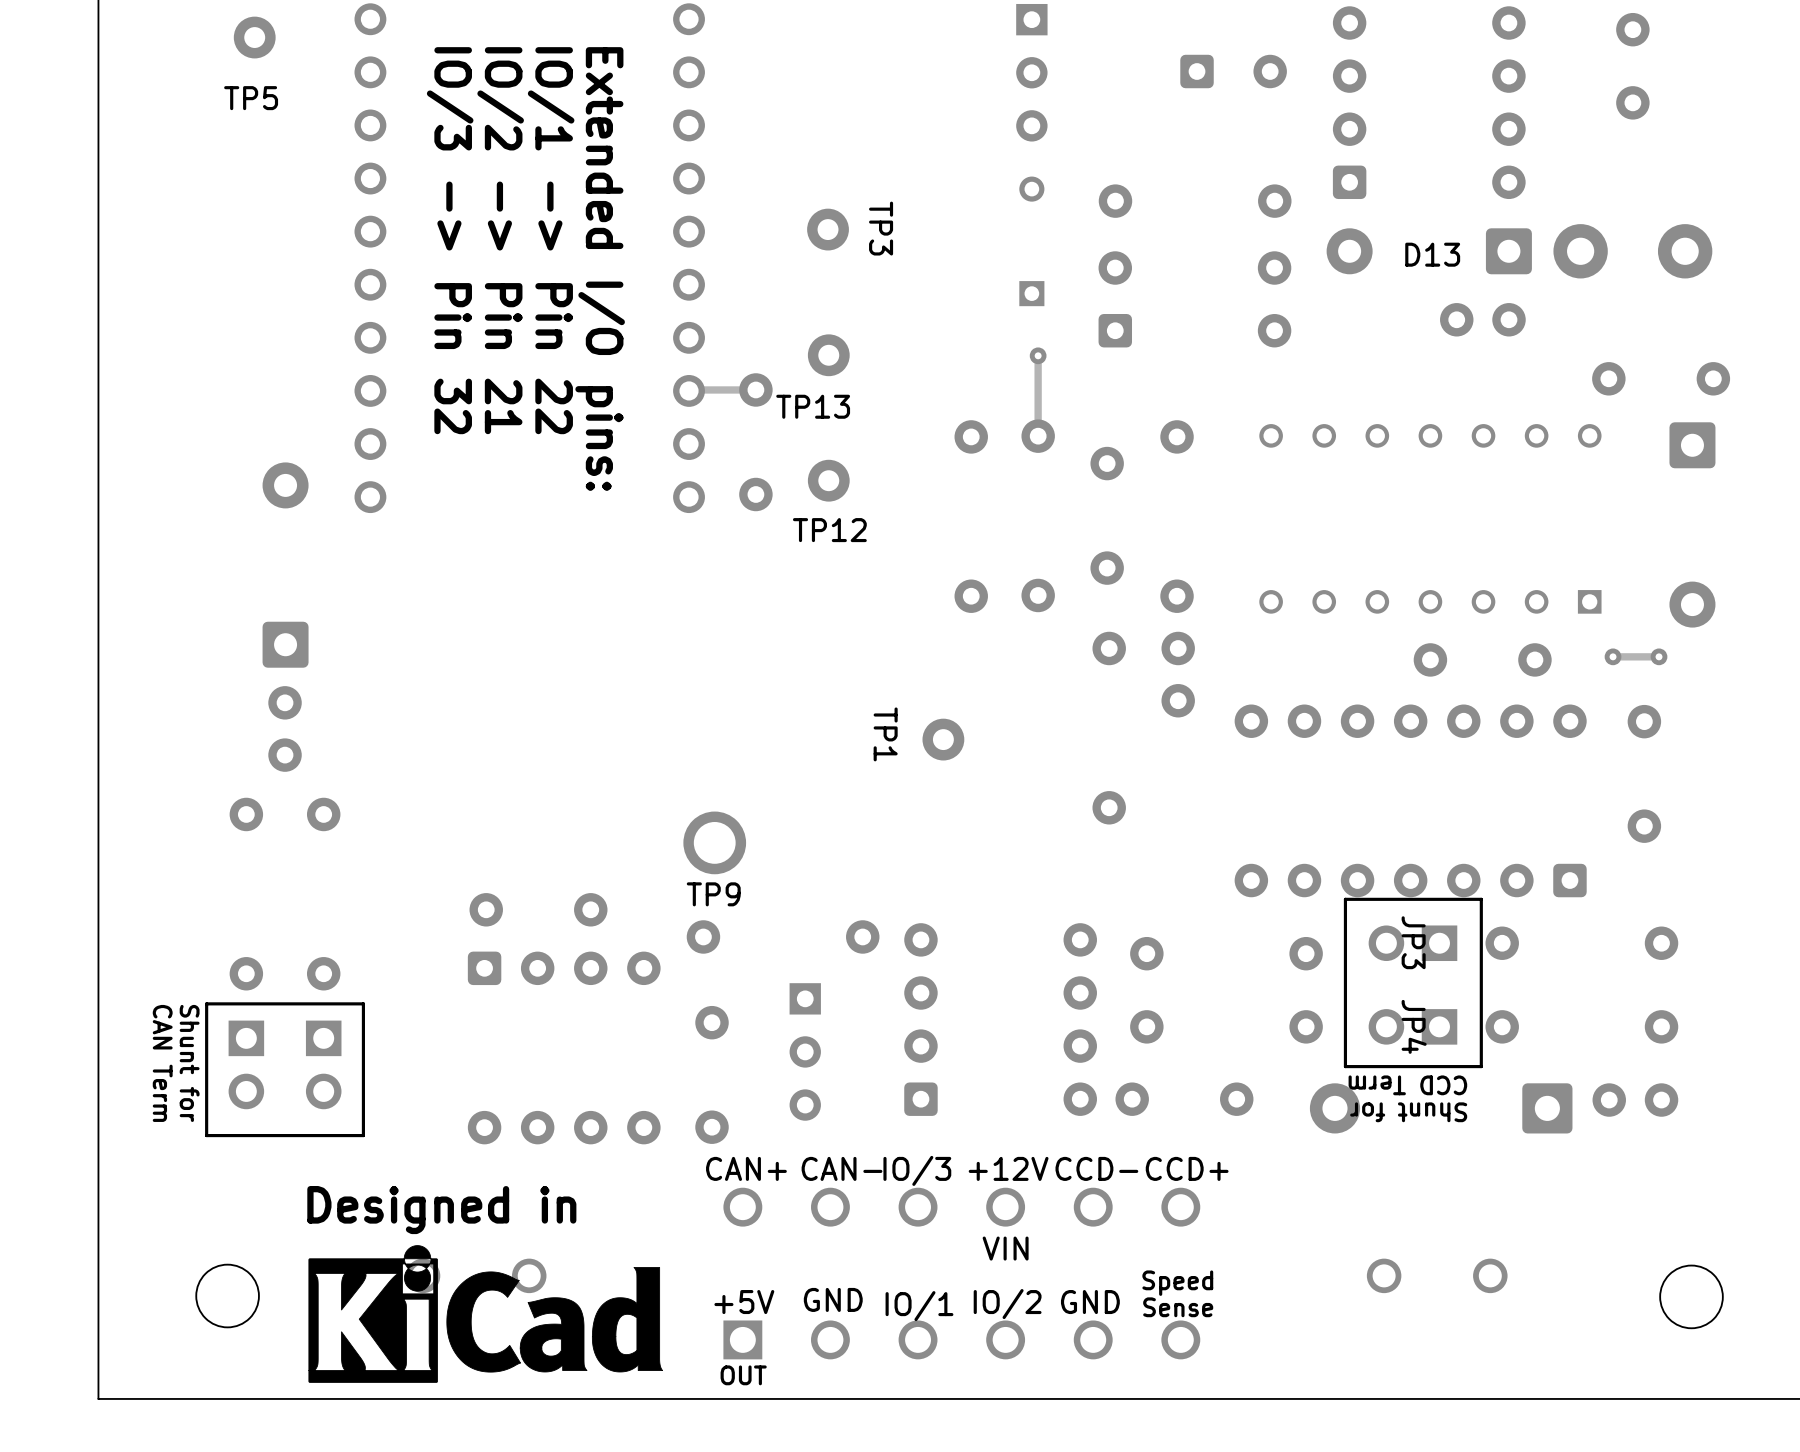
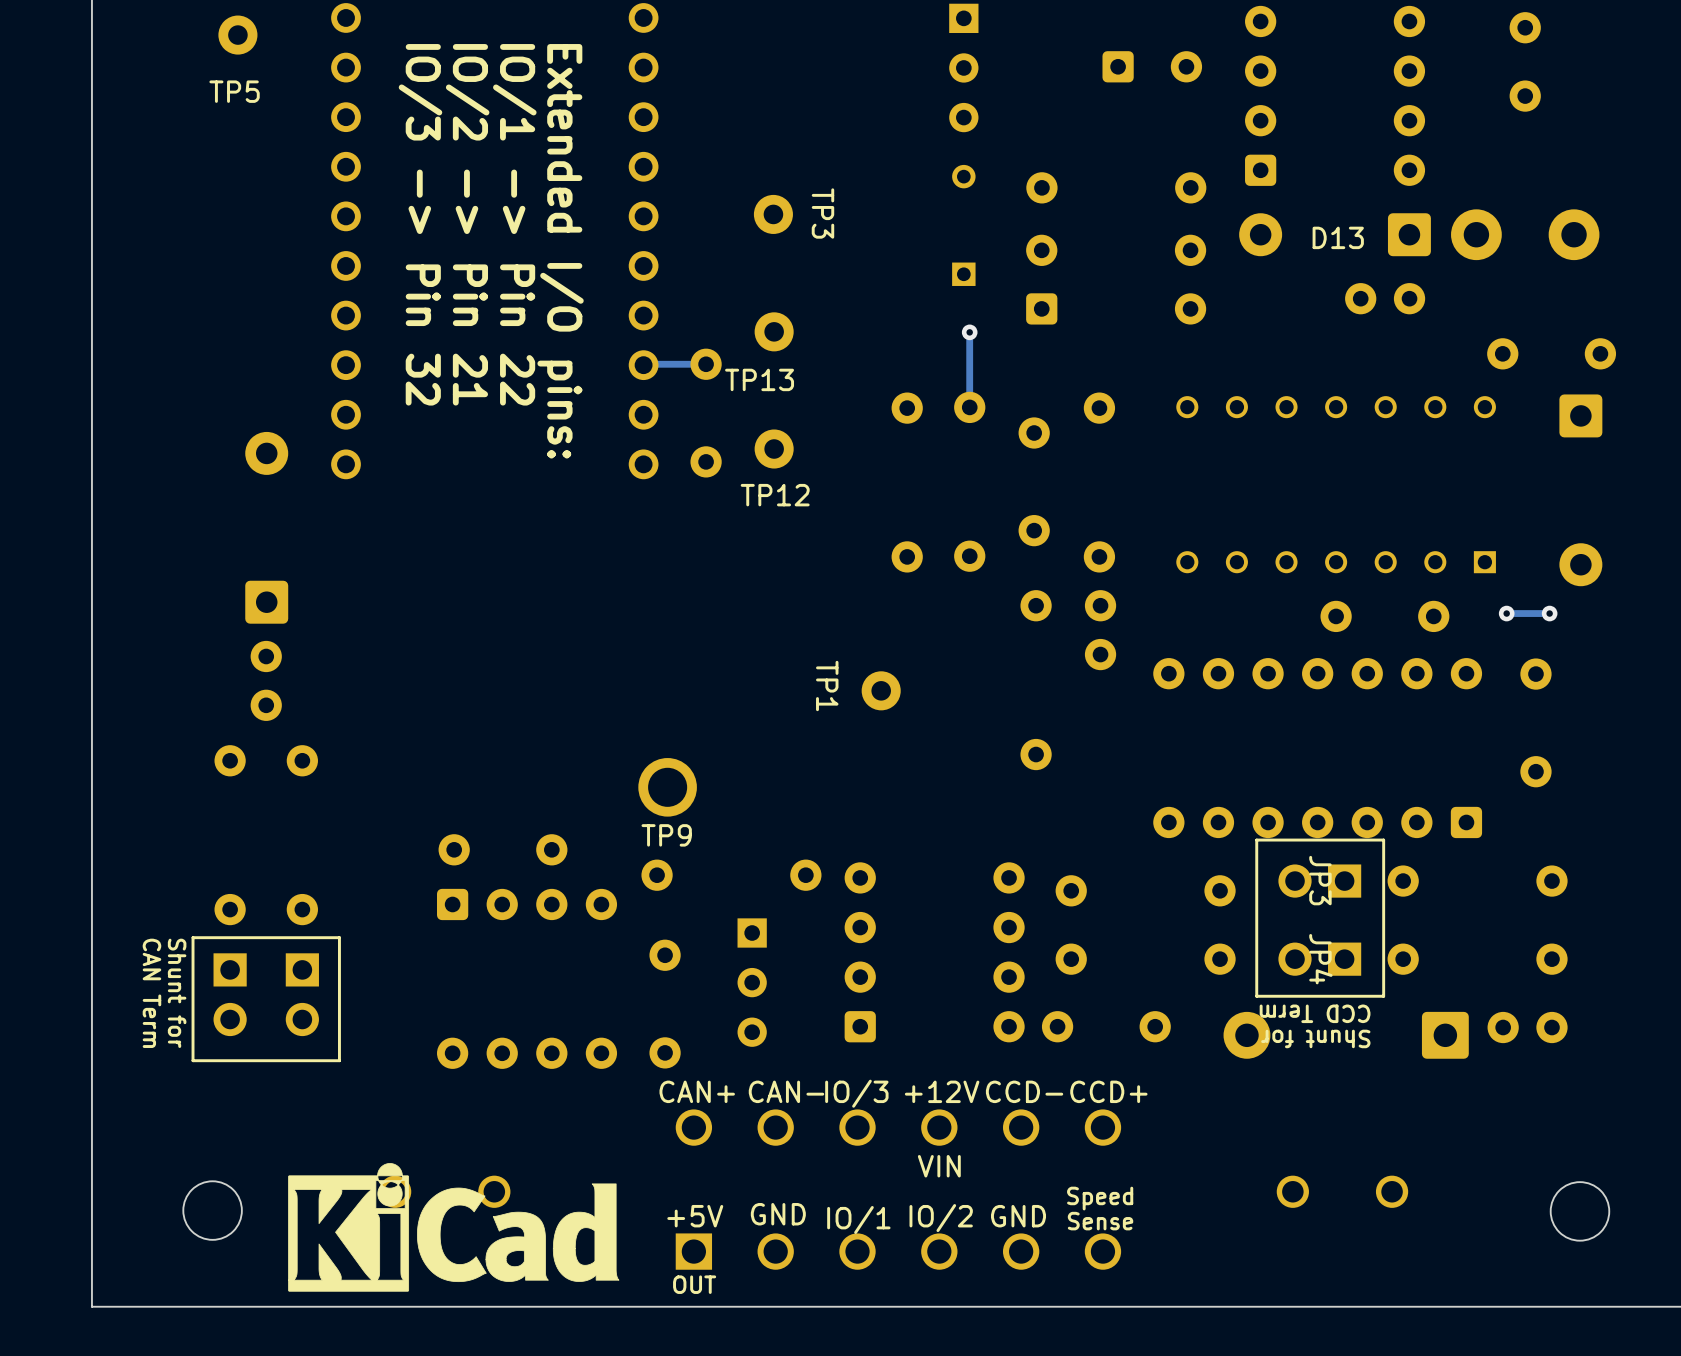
text: Designed in (441, 1210) -> none

